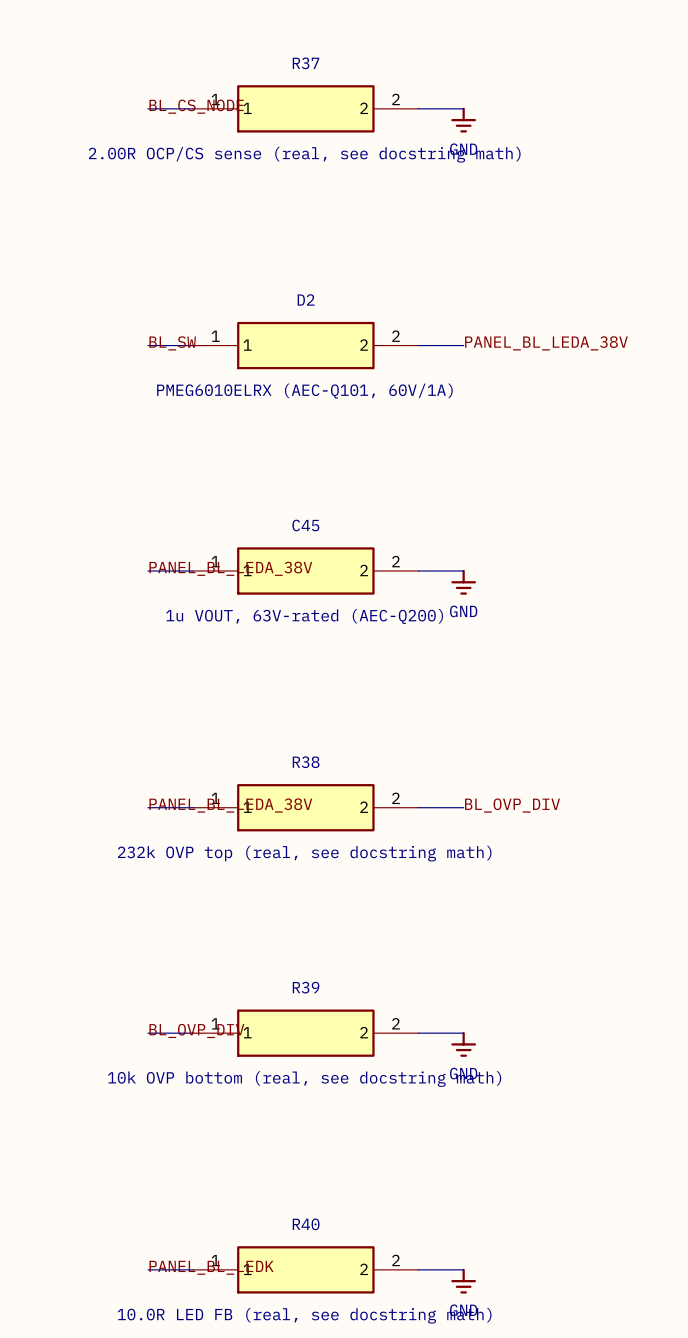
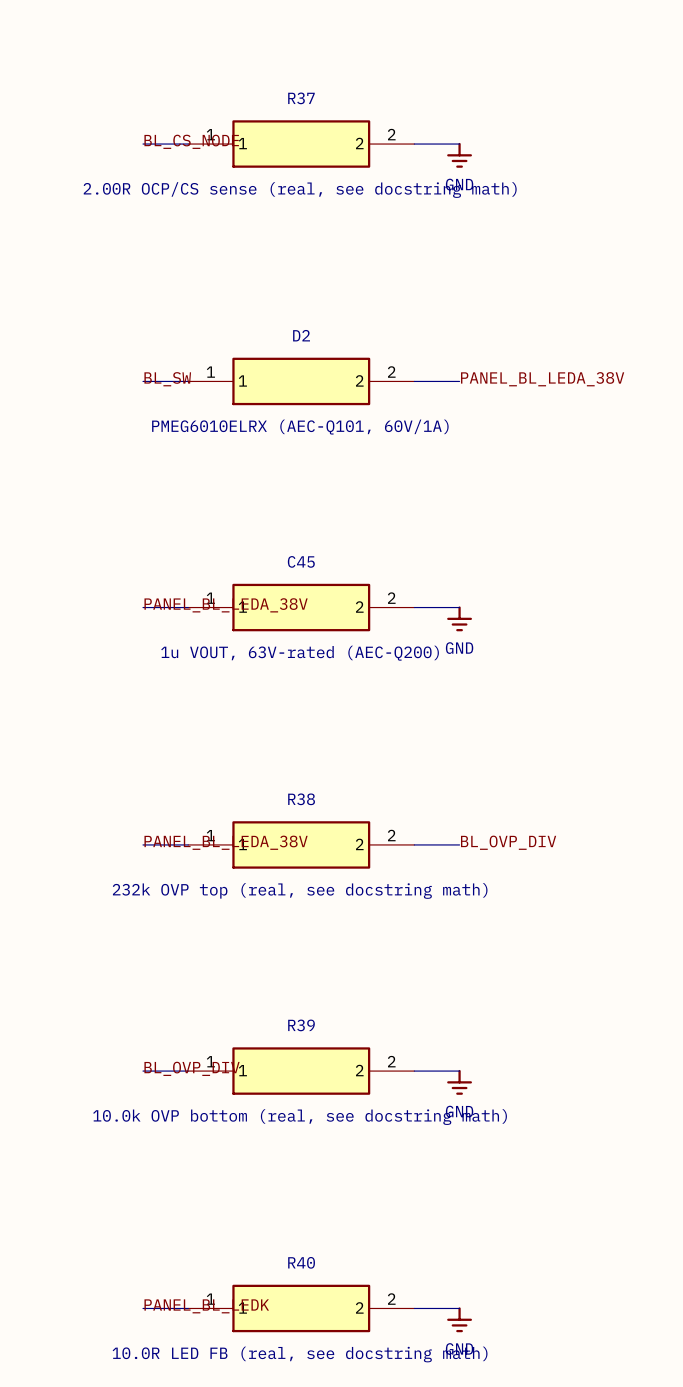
R39 value: 10k OVP bottom (real, see docstring math) (304, 1079) -> 10.0k OVP bottom (real, see docstring math) (300, 1117)

